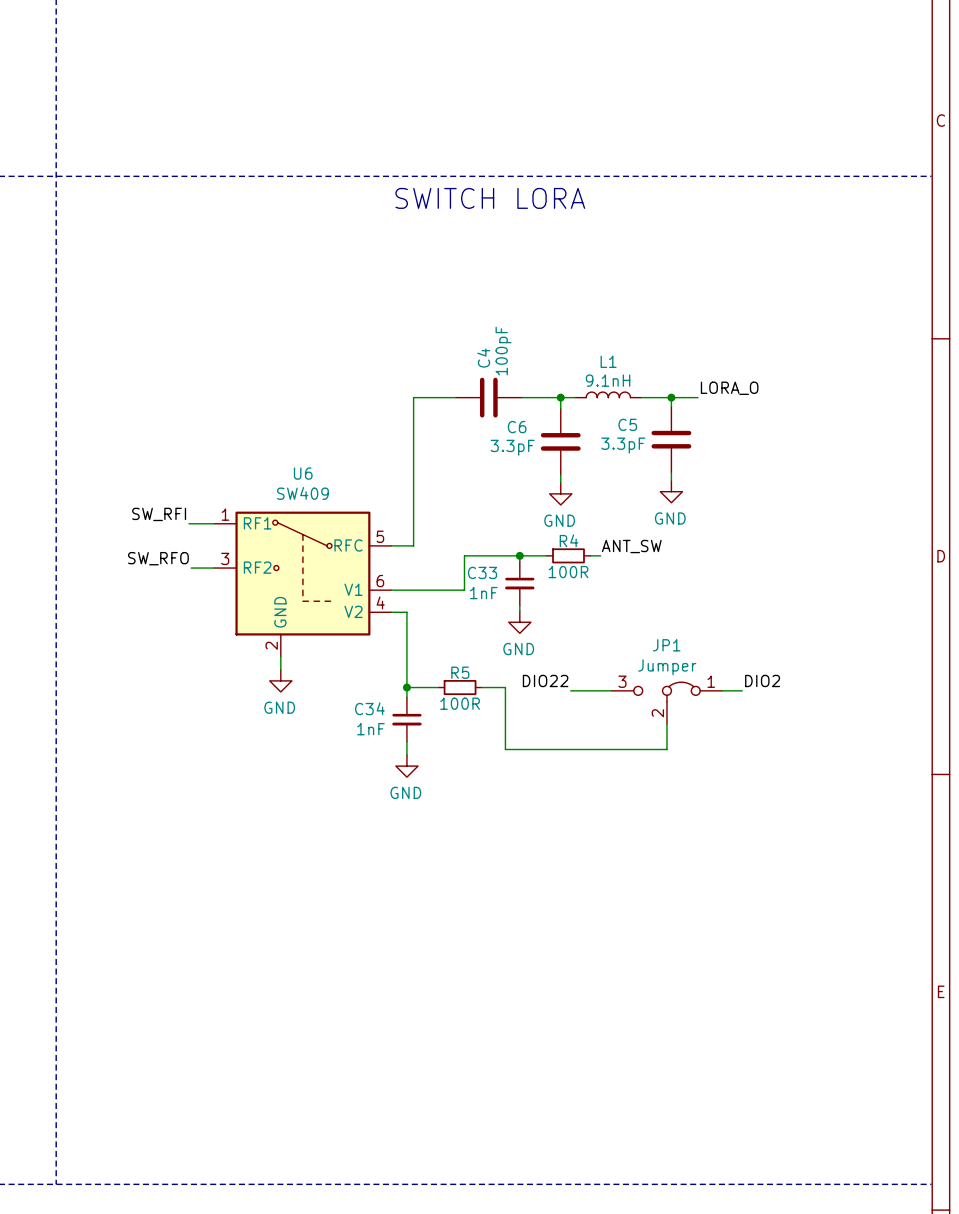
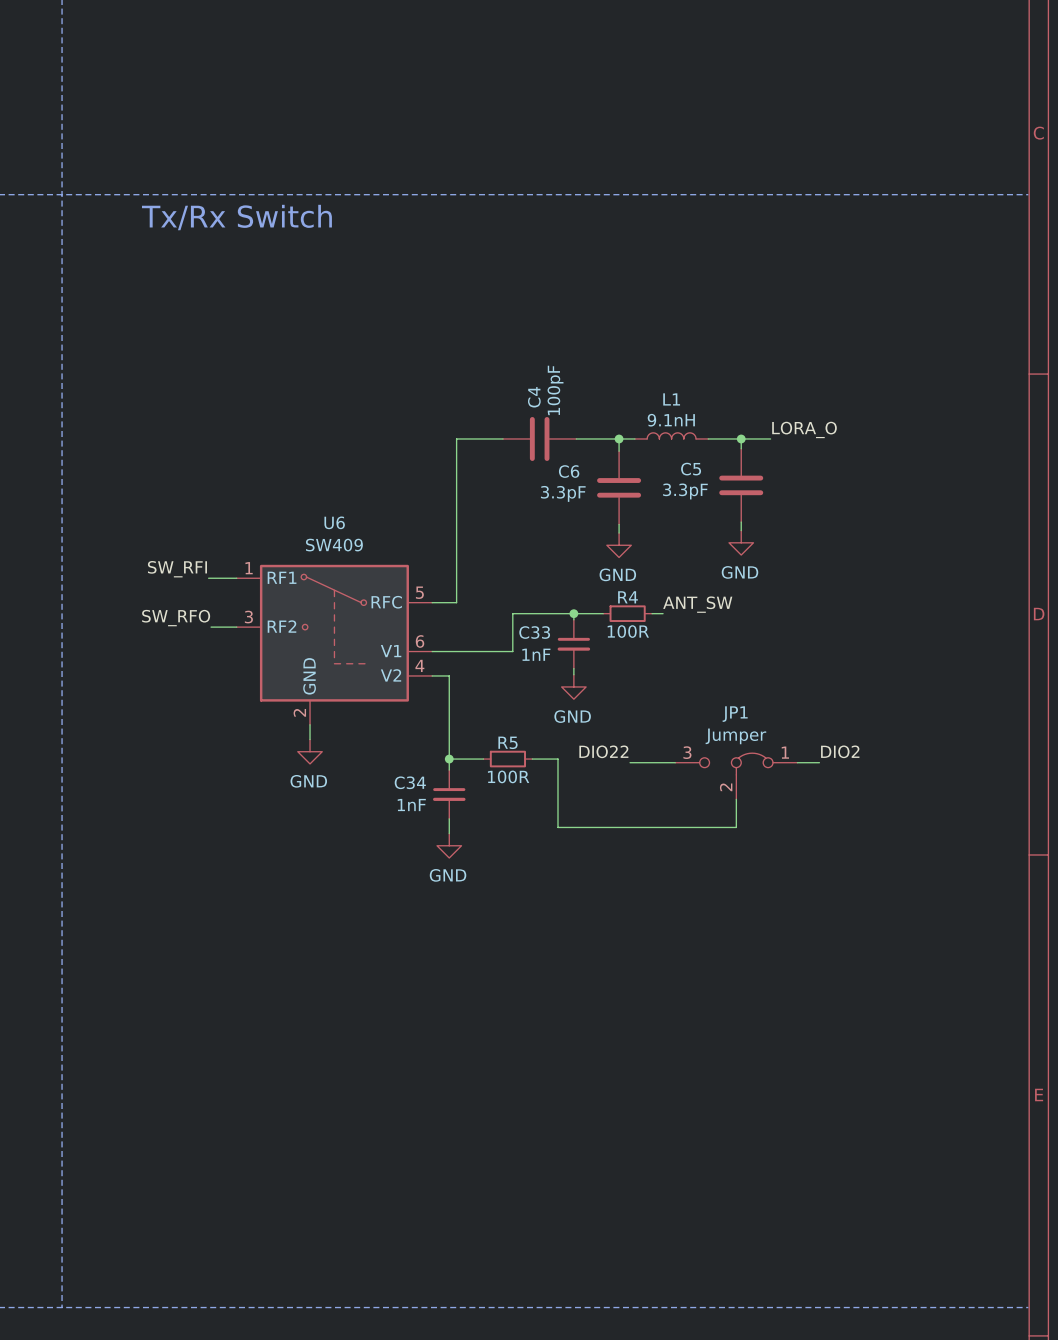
text: none -> Tx/Rx Switch (236, 217)
text: SWITCH LORA (490, 198) -> none

